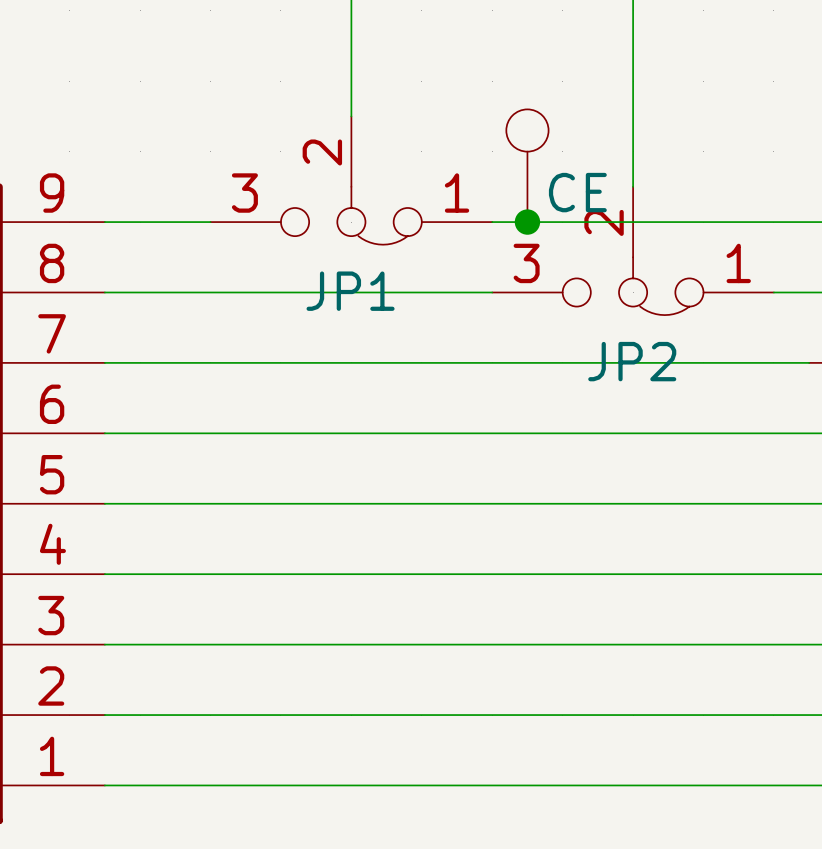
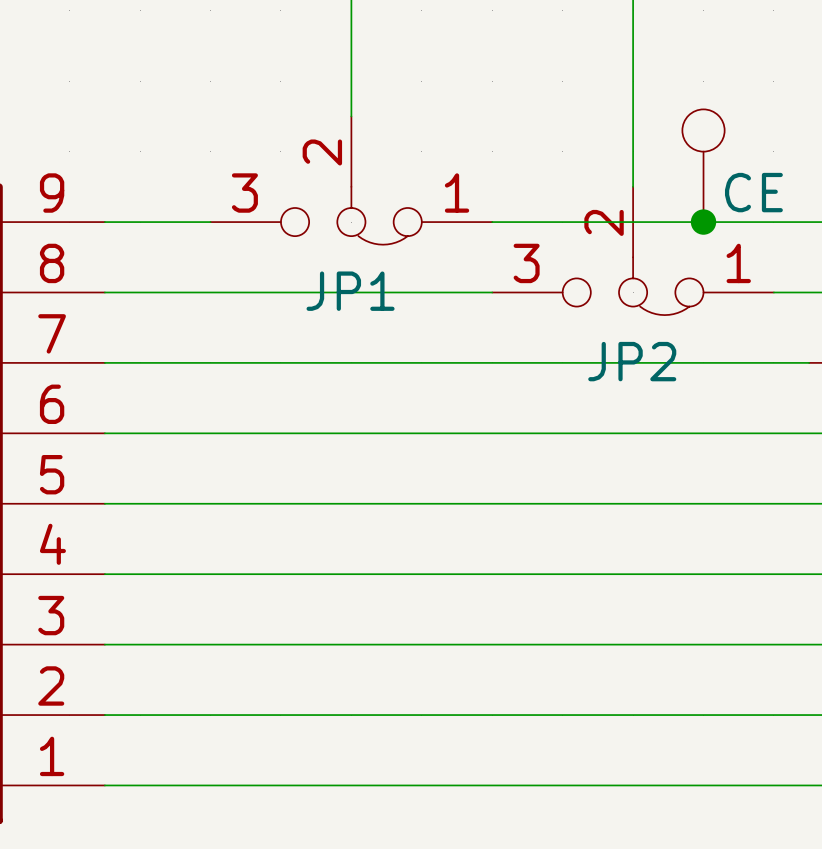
CE position: (527, 165) -> (703, 165)
junction: (527, 222) -> none
junction: none -> (703, 222)

